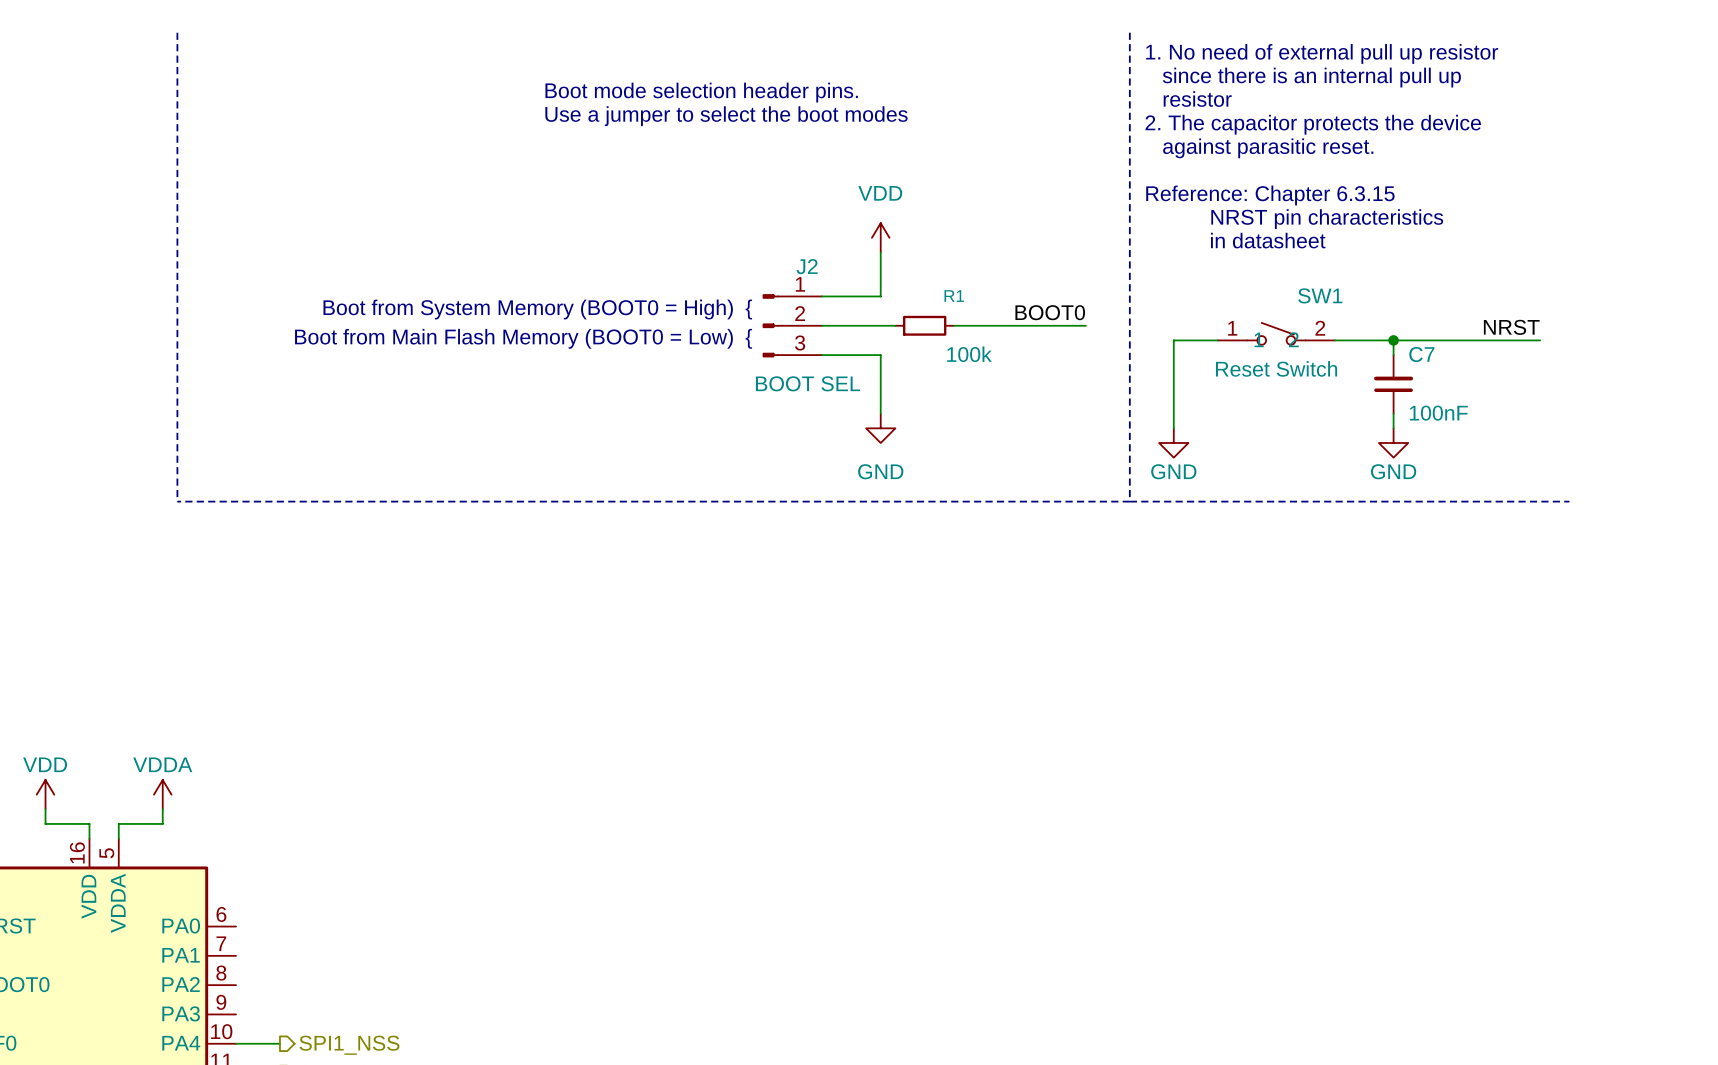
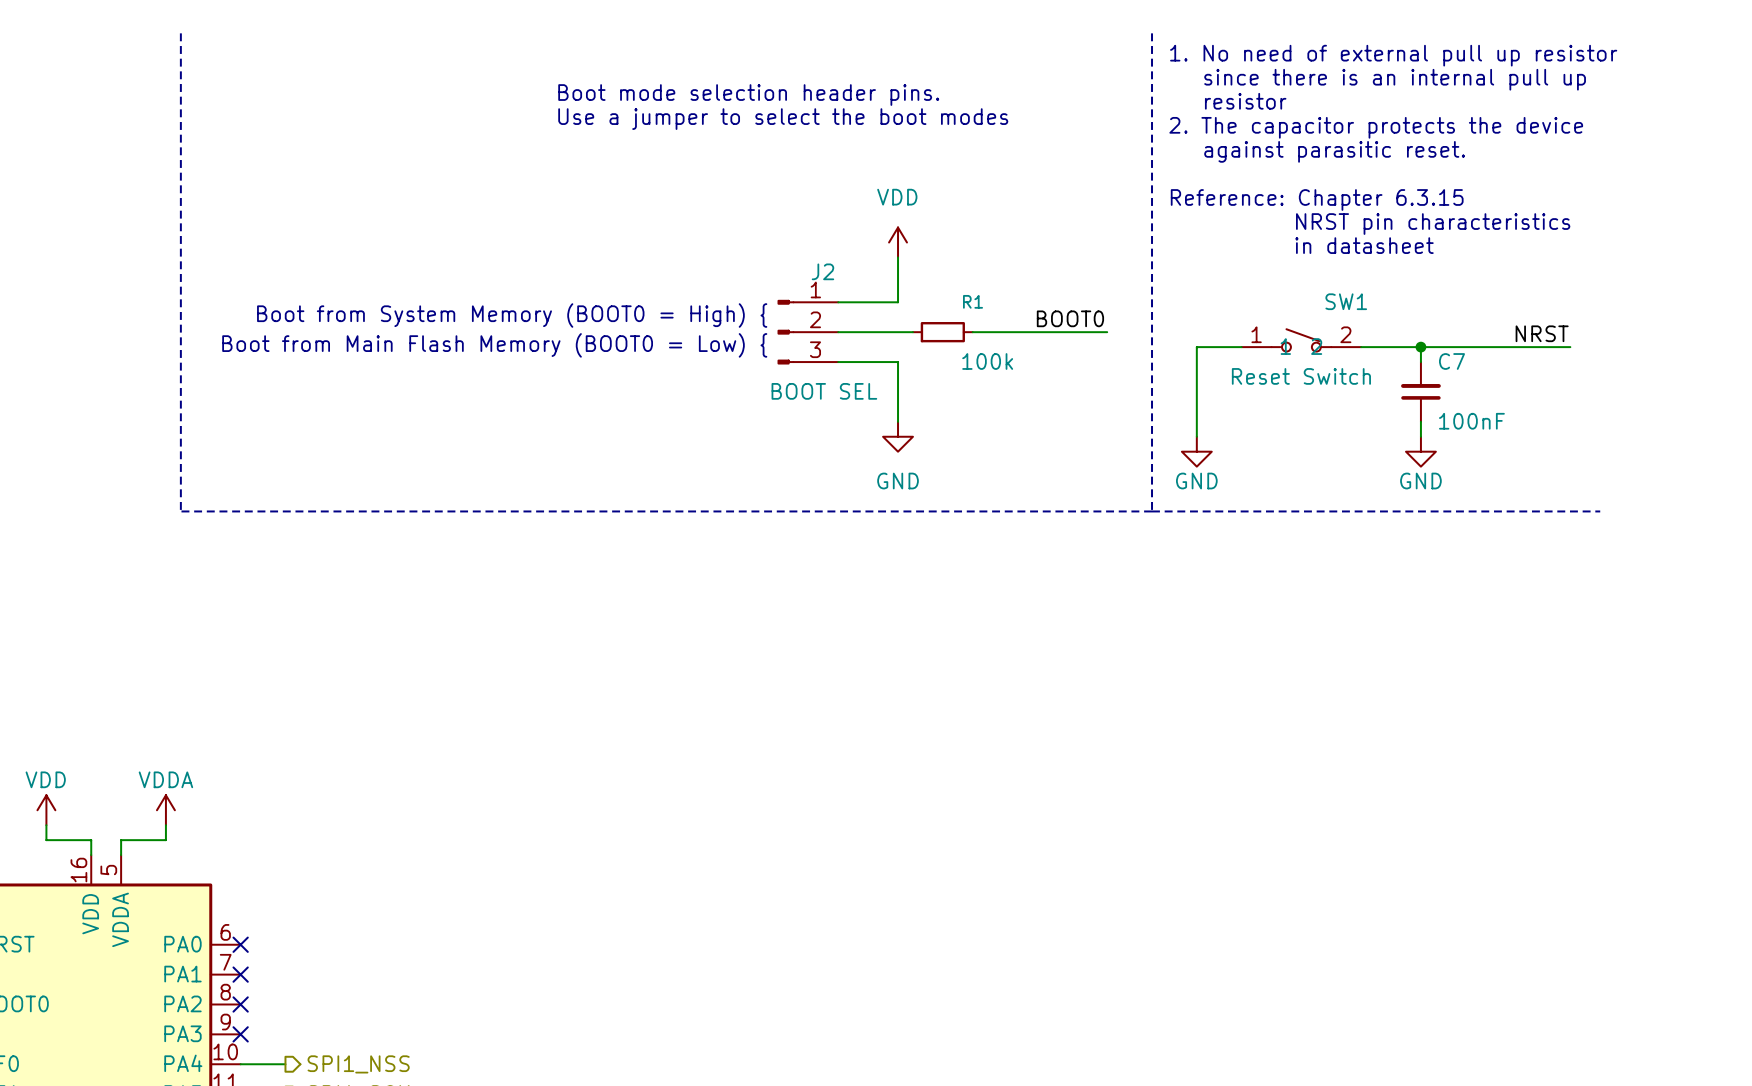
no-connect mark: none -> (240, 944)
no-connect mark: none -> (240, 974)
no-connect mark: none -> (240, 1004)
no-connect mark: none -> (240, 1034)

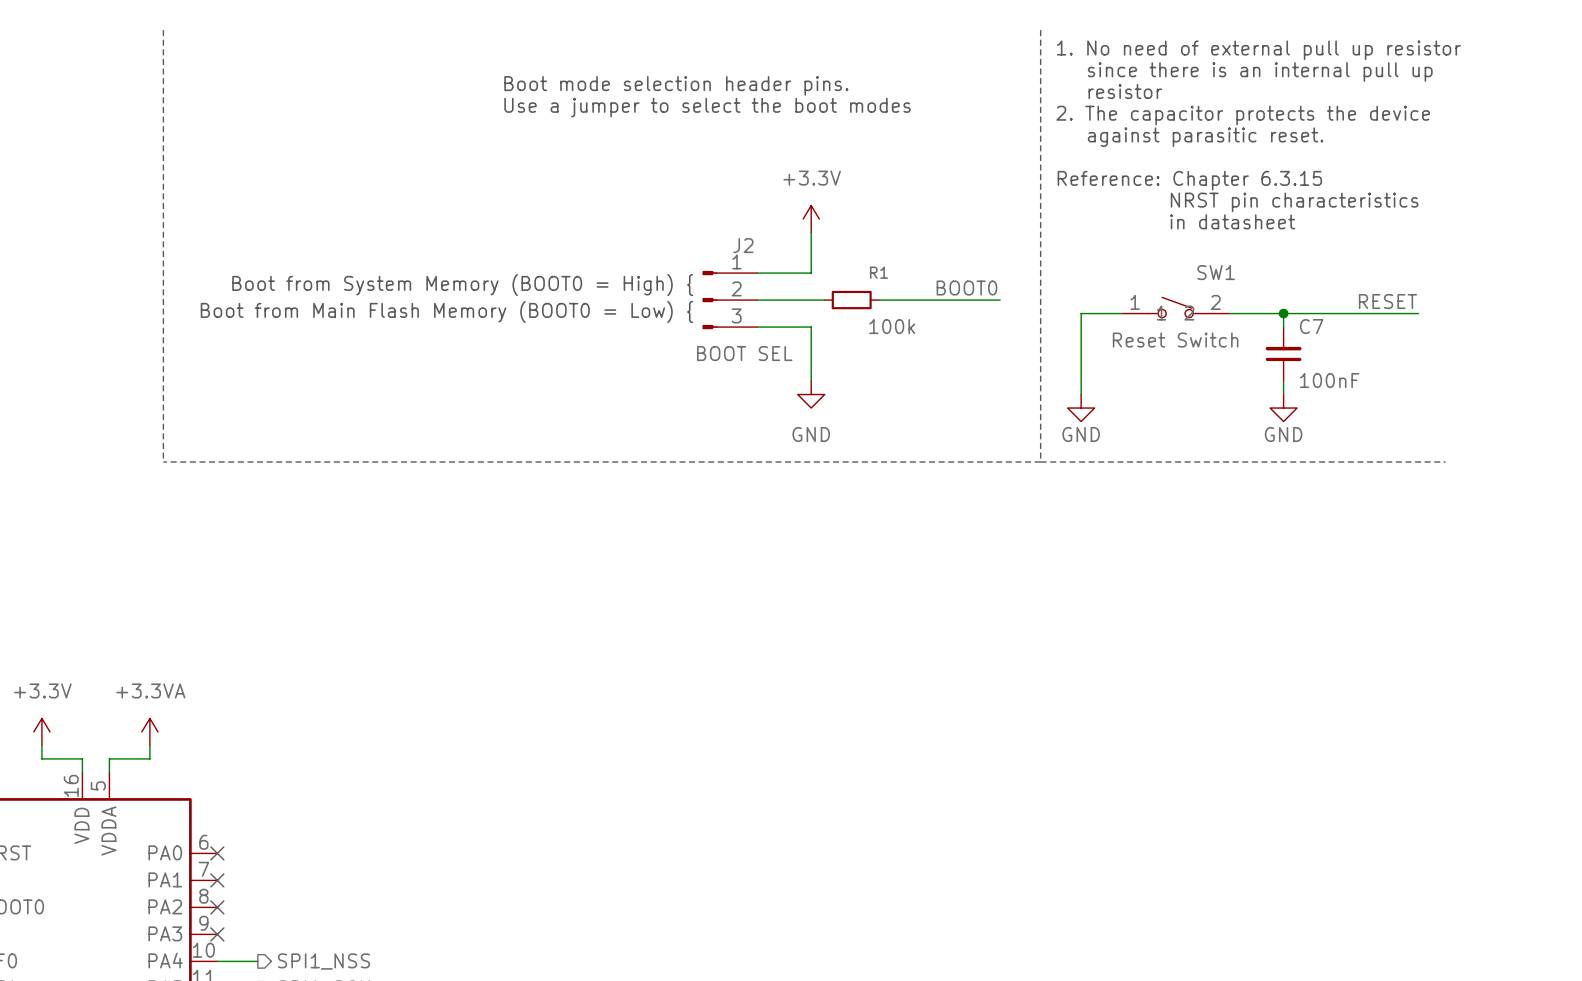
power symbol: VDD (898, 242) -> +3.3V (811, 219)
label: NRST (1542, 333) -> RESET (1387, 301)
power symbol: VDD (46, 810) -> +3.3V (41, 731)
power symbol: VDDA (165, 810) -> +3.3VA (149, 731)

